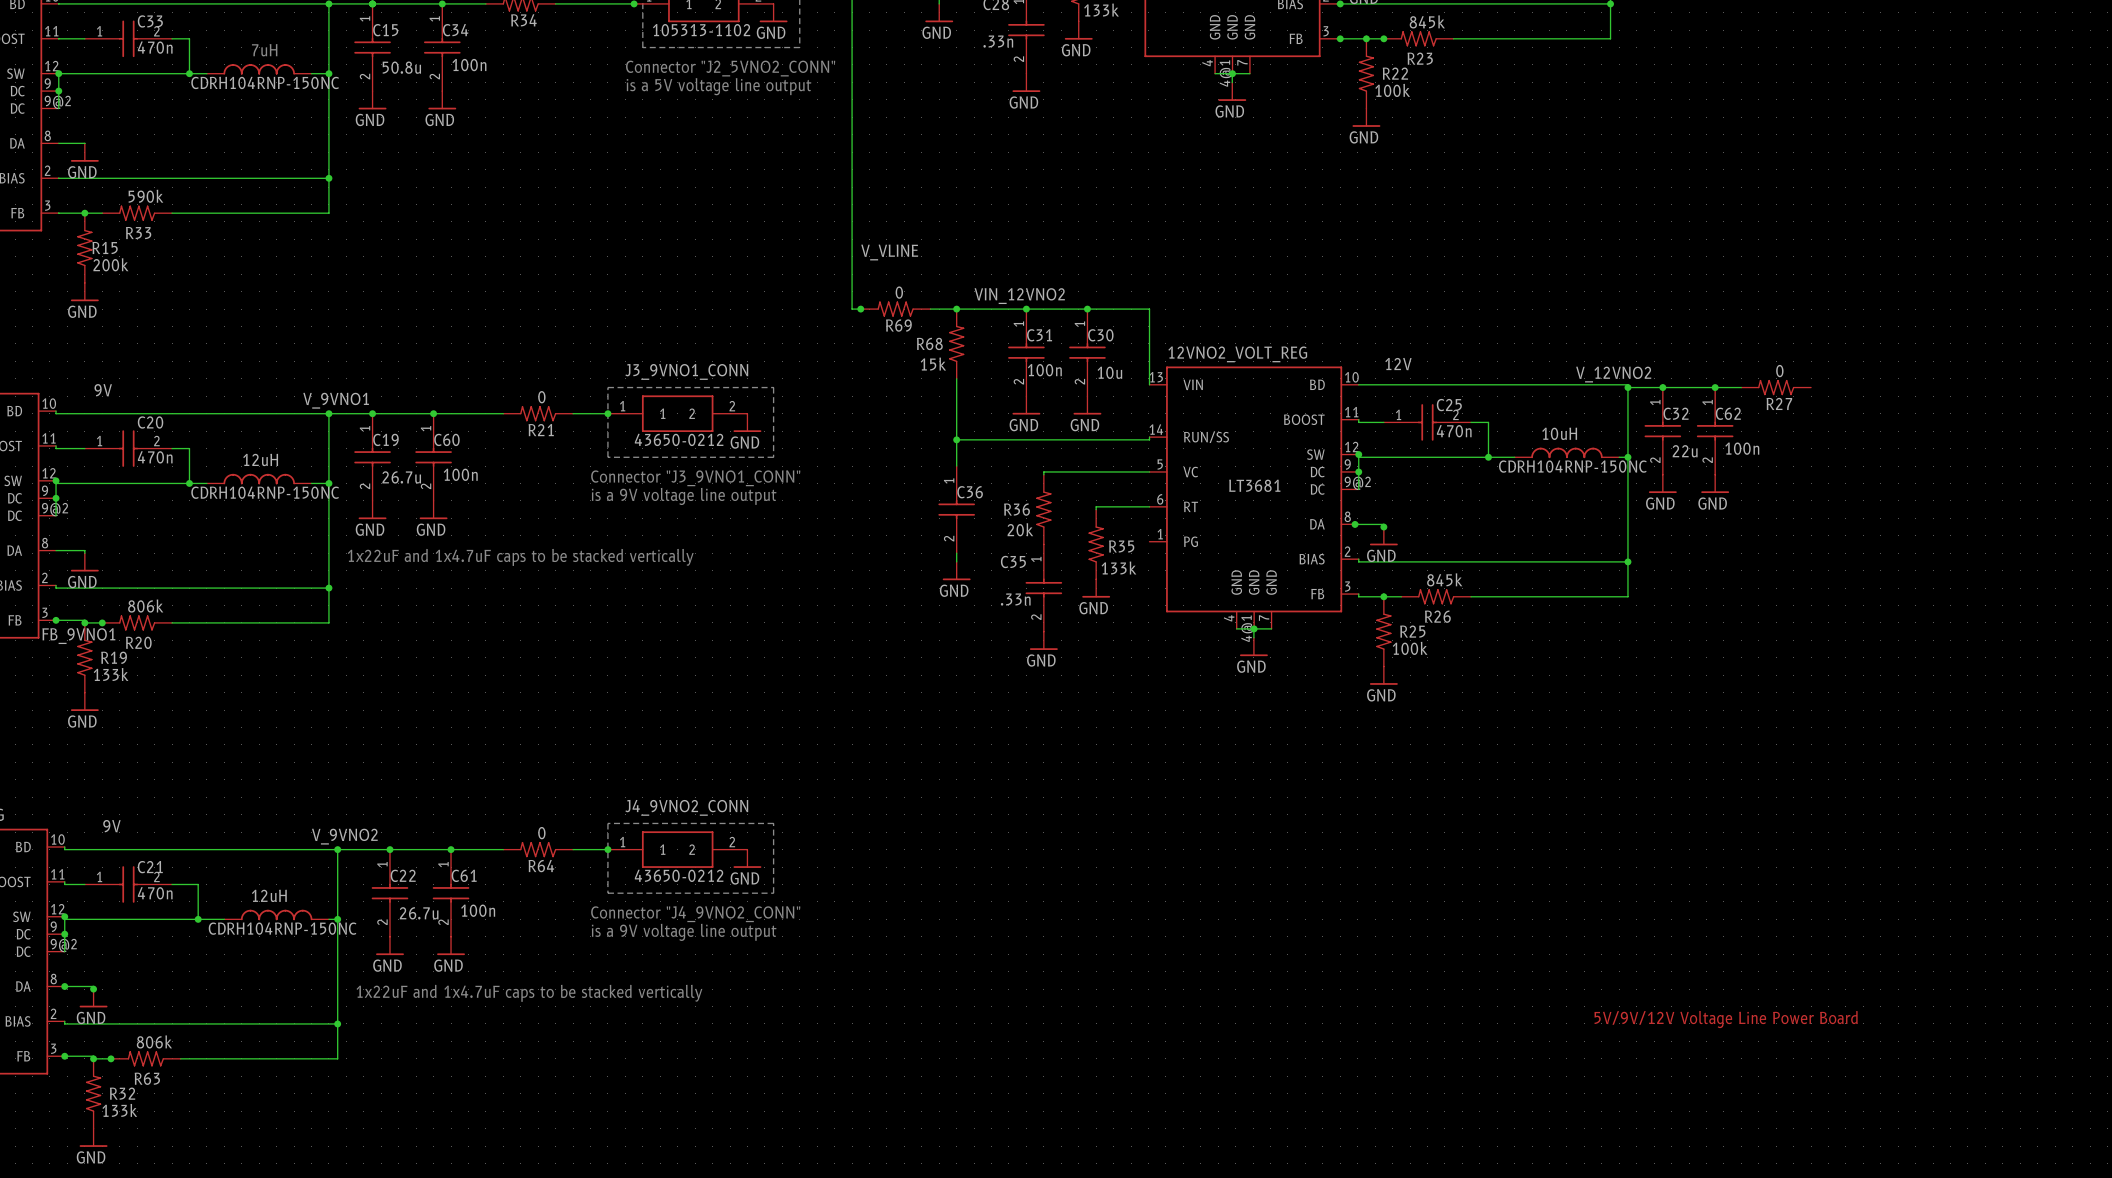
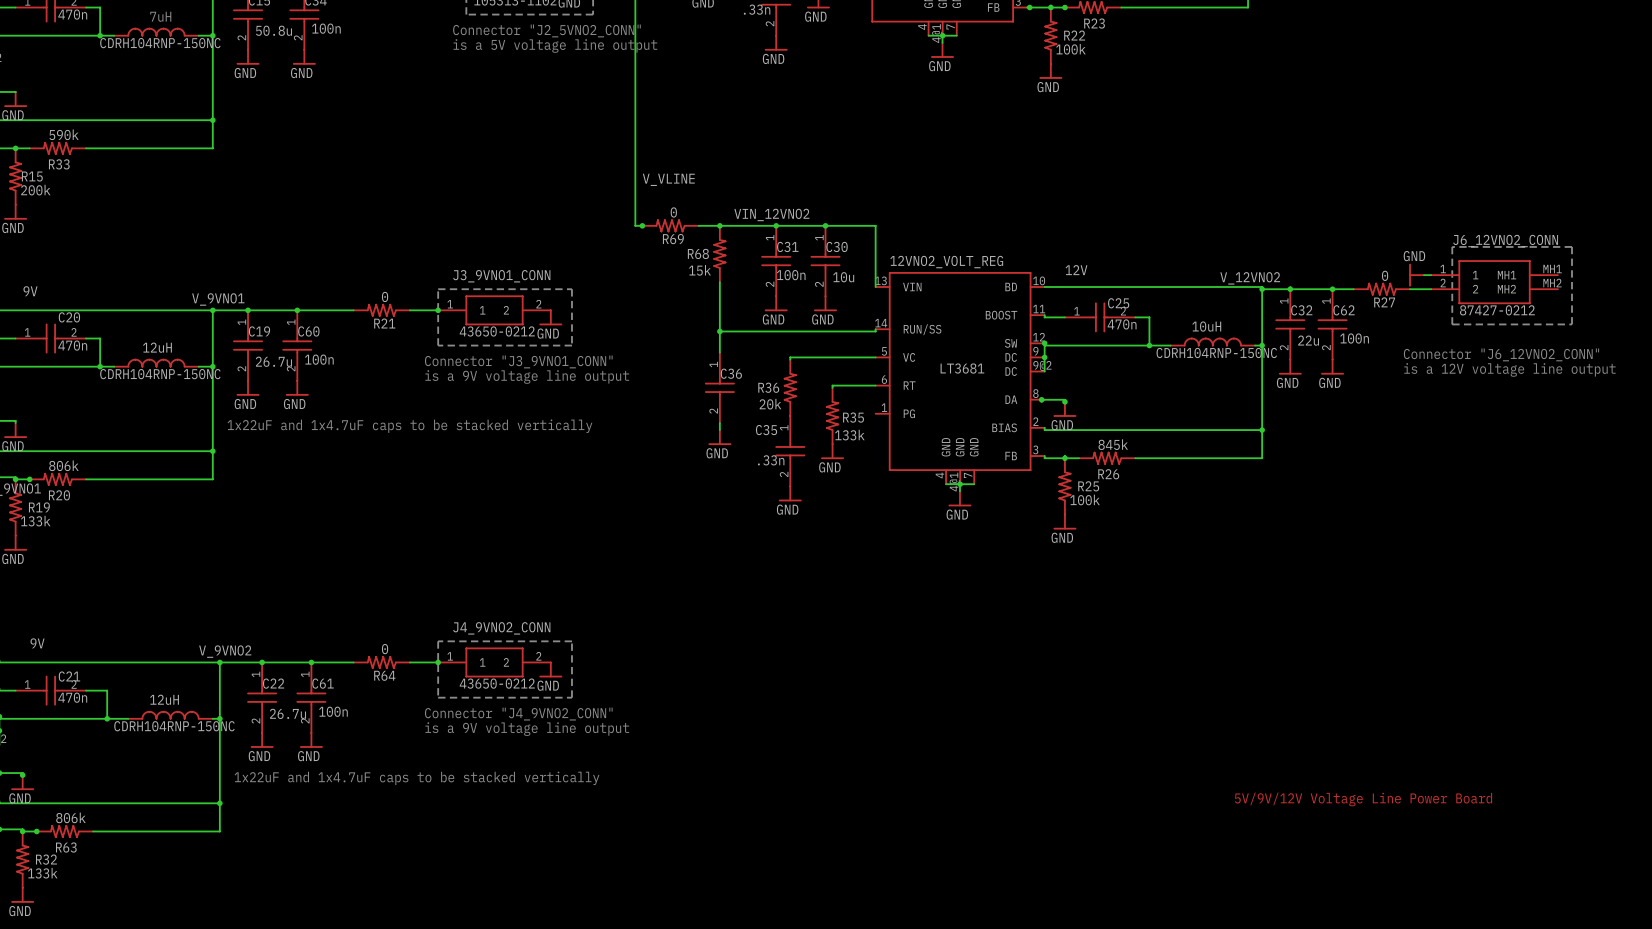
line: none -> (1452, 246) (1452, 324) (1572, 324) (1572, 246) (1452, 246)
power symbol: none -> GND (1416, 275)
wire: none -> (1424, 275) (1431, 275)
J6_12VNO2_CONN: none -> 87427-0212 (1494, 282)
wire: none -> (1410, 289) (1431, 289)
text: none -> Connector "J6_12VNO2_CONN" (1501, 354)
text: none -> is a 12V voltage line output (1509, 369)

